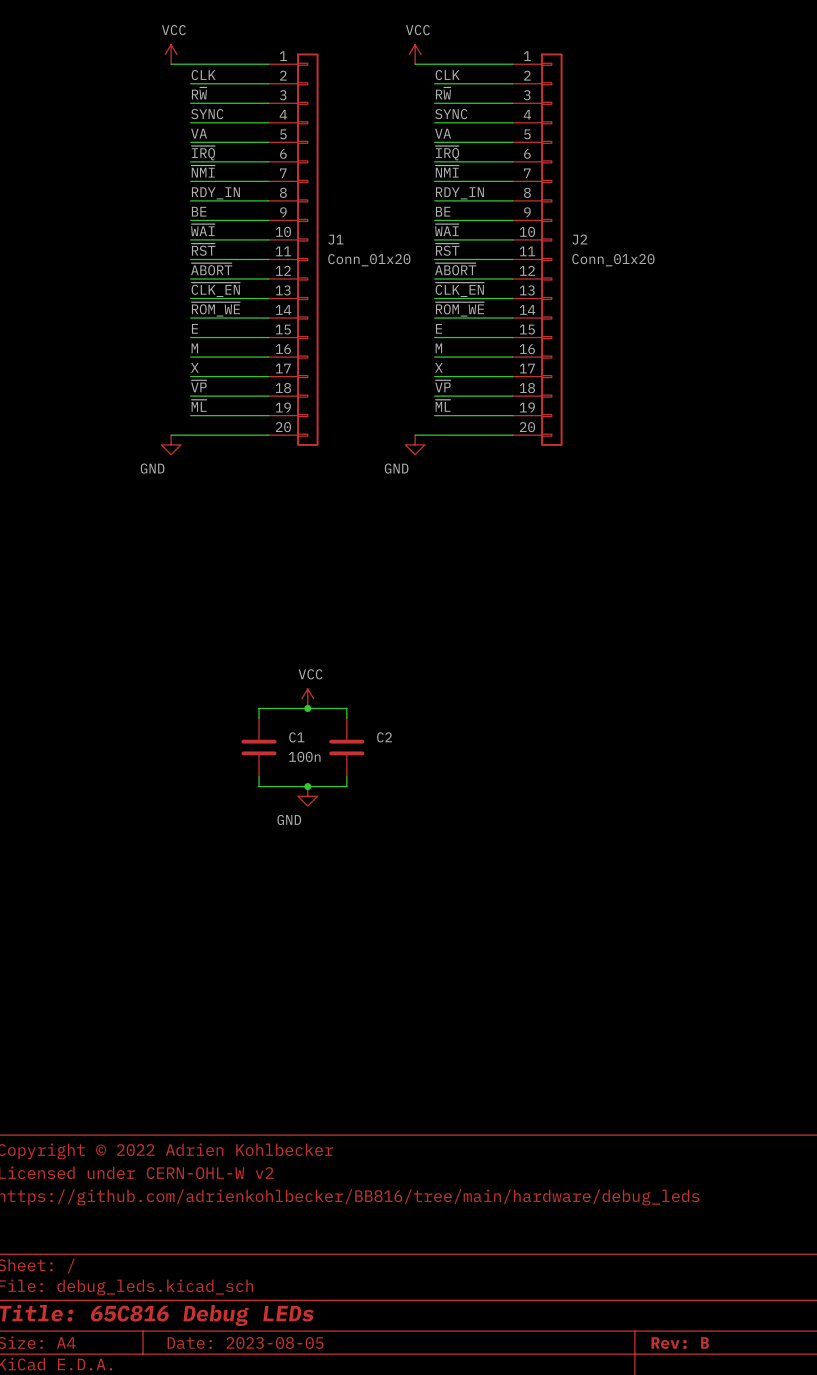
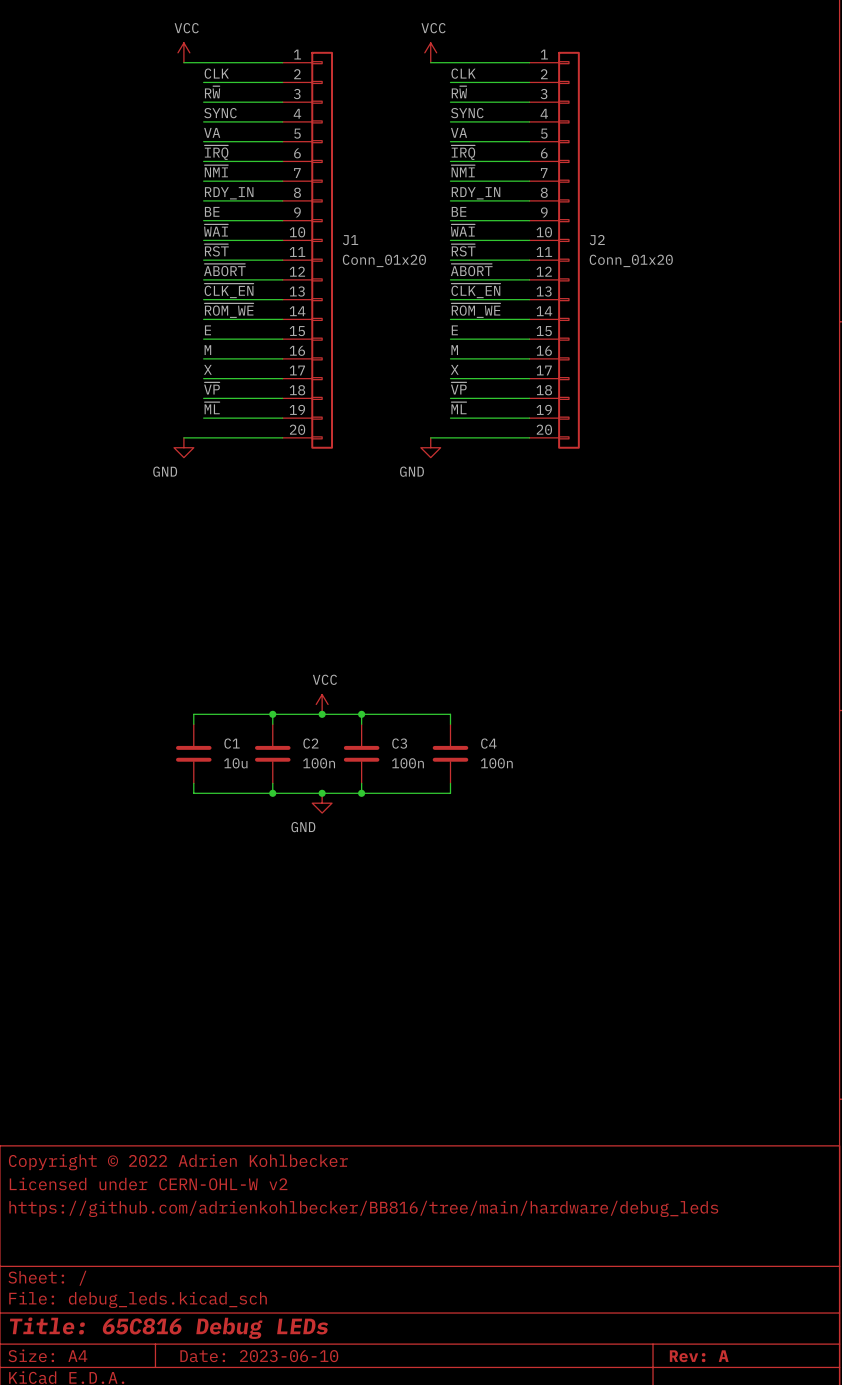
wire: none -> (272, 714) (193, 714) (193, 724)
junction: none -> (272, 714)
wire: none -> (361, 714) (450, 714) (450, 724)
junction: none -> (361, 714)
C1 name: C1 (296, 737) -> C2 (310, 743)
C2 name: C2 (384, 737) -> C3 (399, 743)
C1: none -> 10u (193, 753)
C4: none -> 100n (450, 753)
C2 value: none -> 100n (407, 763)
wire: none -> (193, 783) (193, 793) (272, 793)
wire: none -> (450, 783) (450, 793) (361, 793)
junction: none -> (272, 793)
junction: none -> (361, 793)
title block: Date: 2023-08-05 (245, 1342) -> Date: 2023-06-10 (259, 1356)
title block: Rev: B (680, 1343) -> Rev: A (699, 1356)

